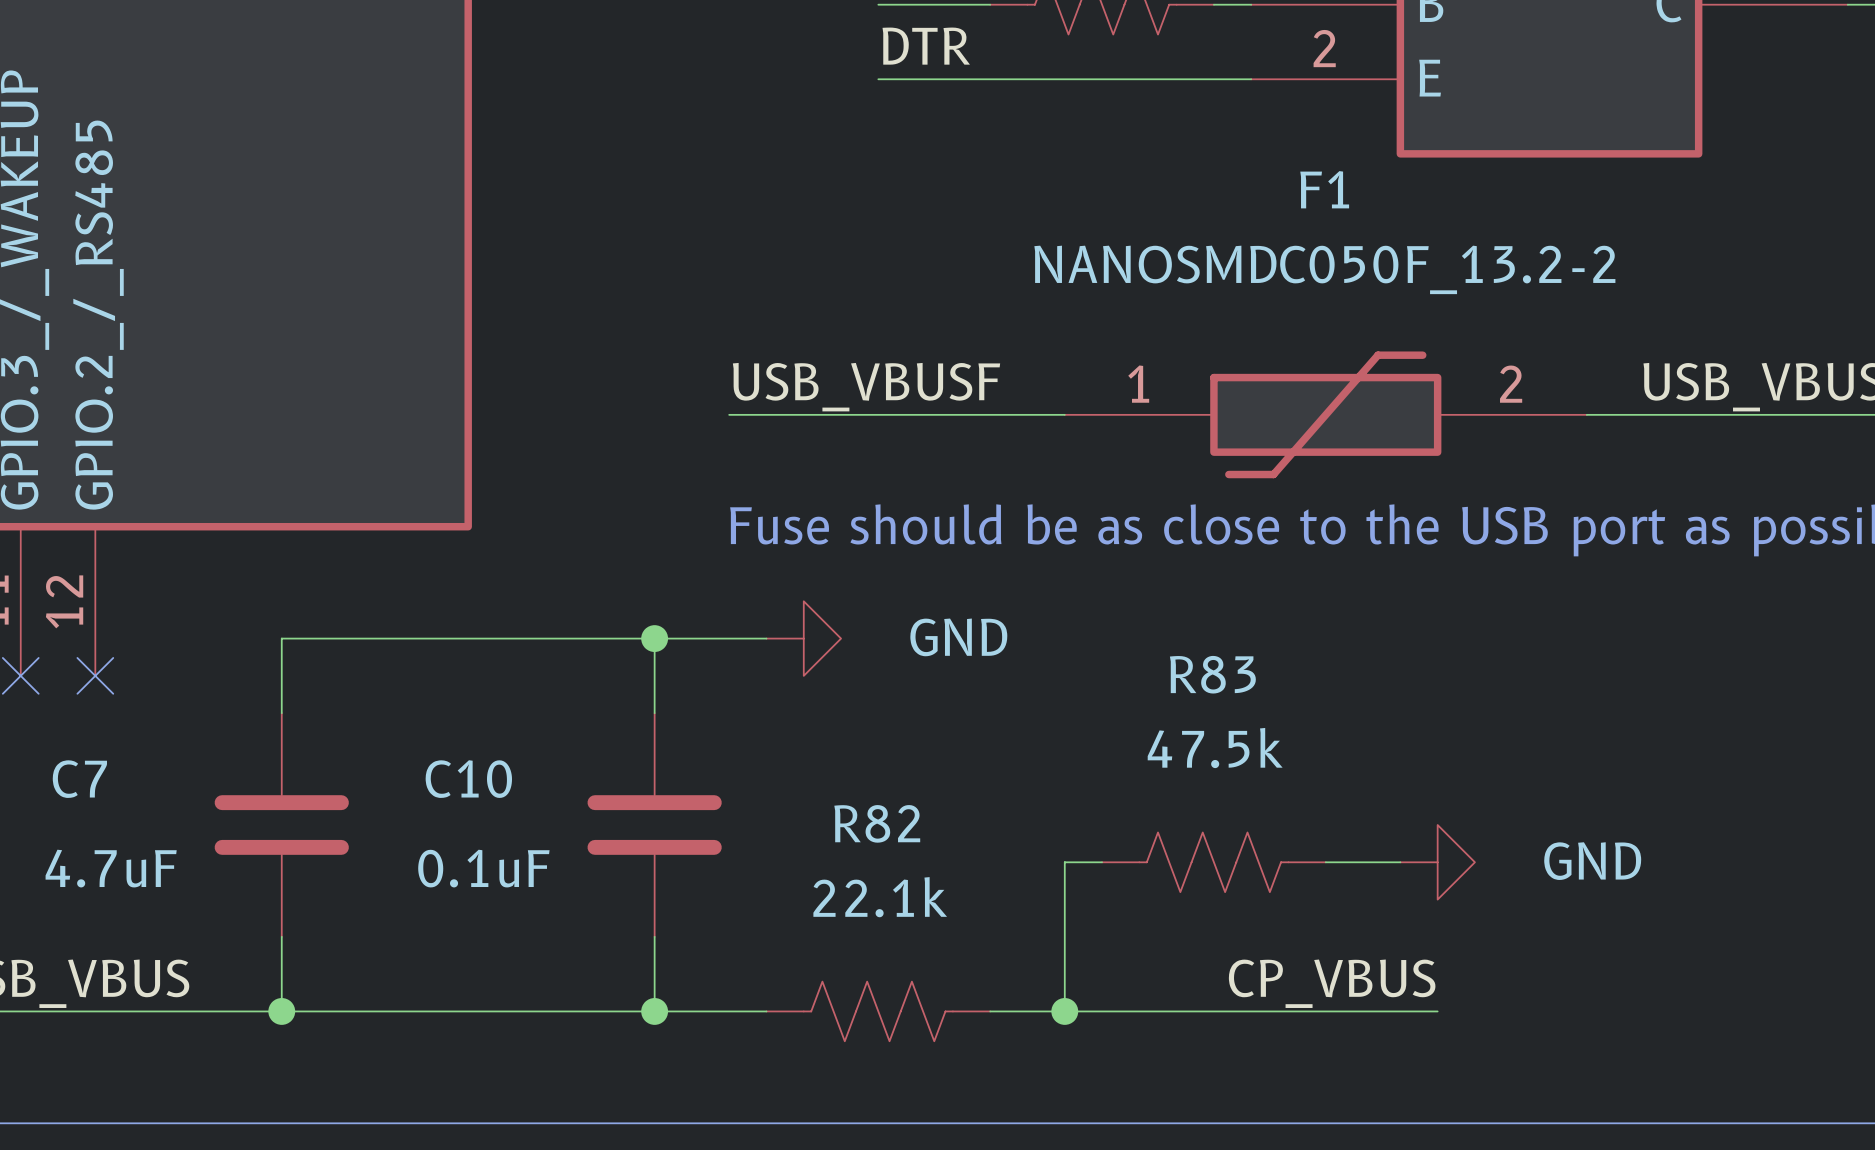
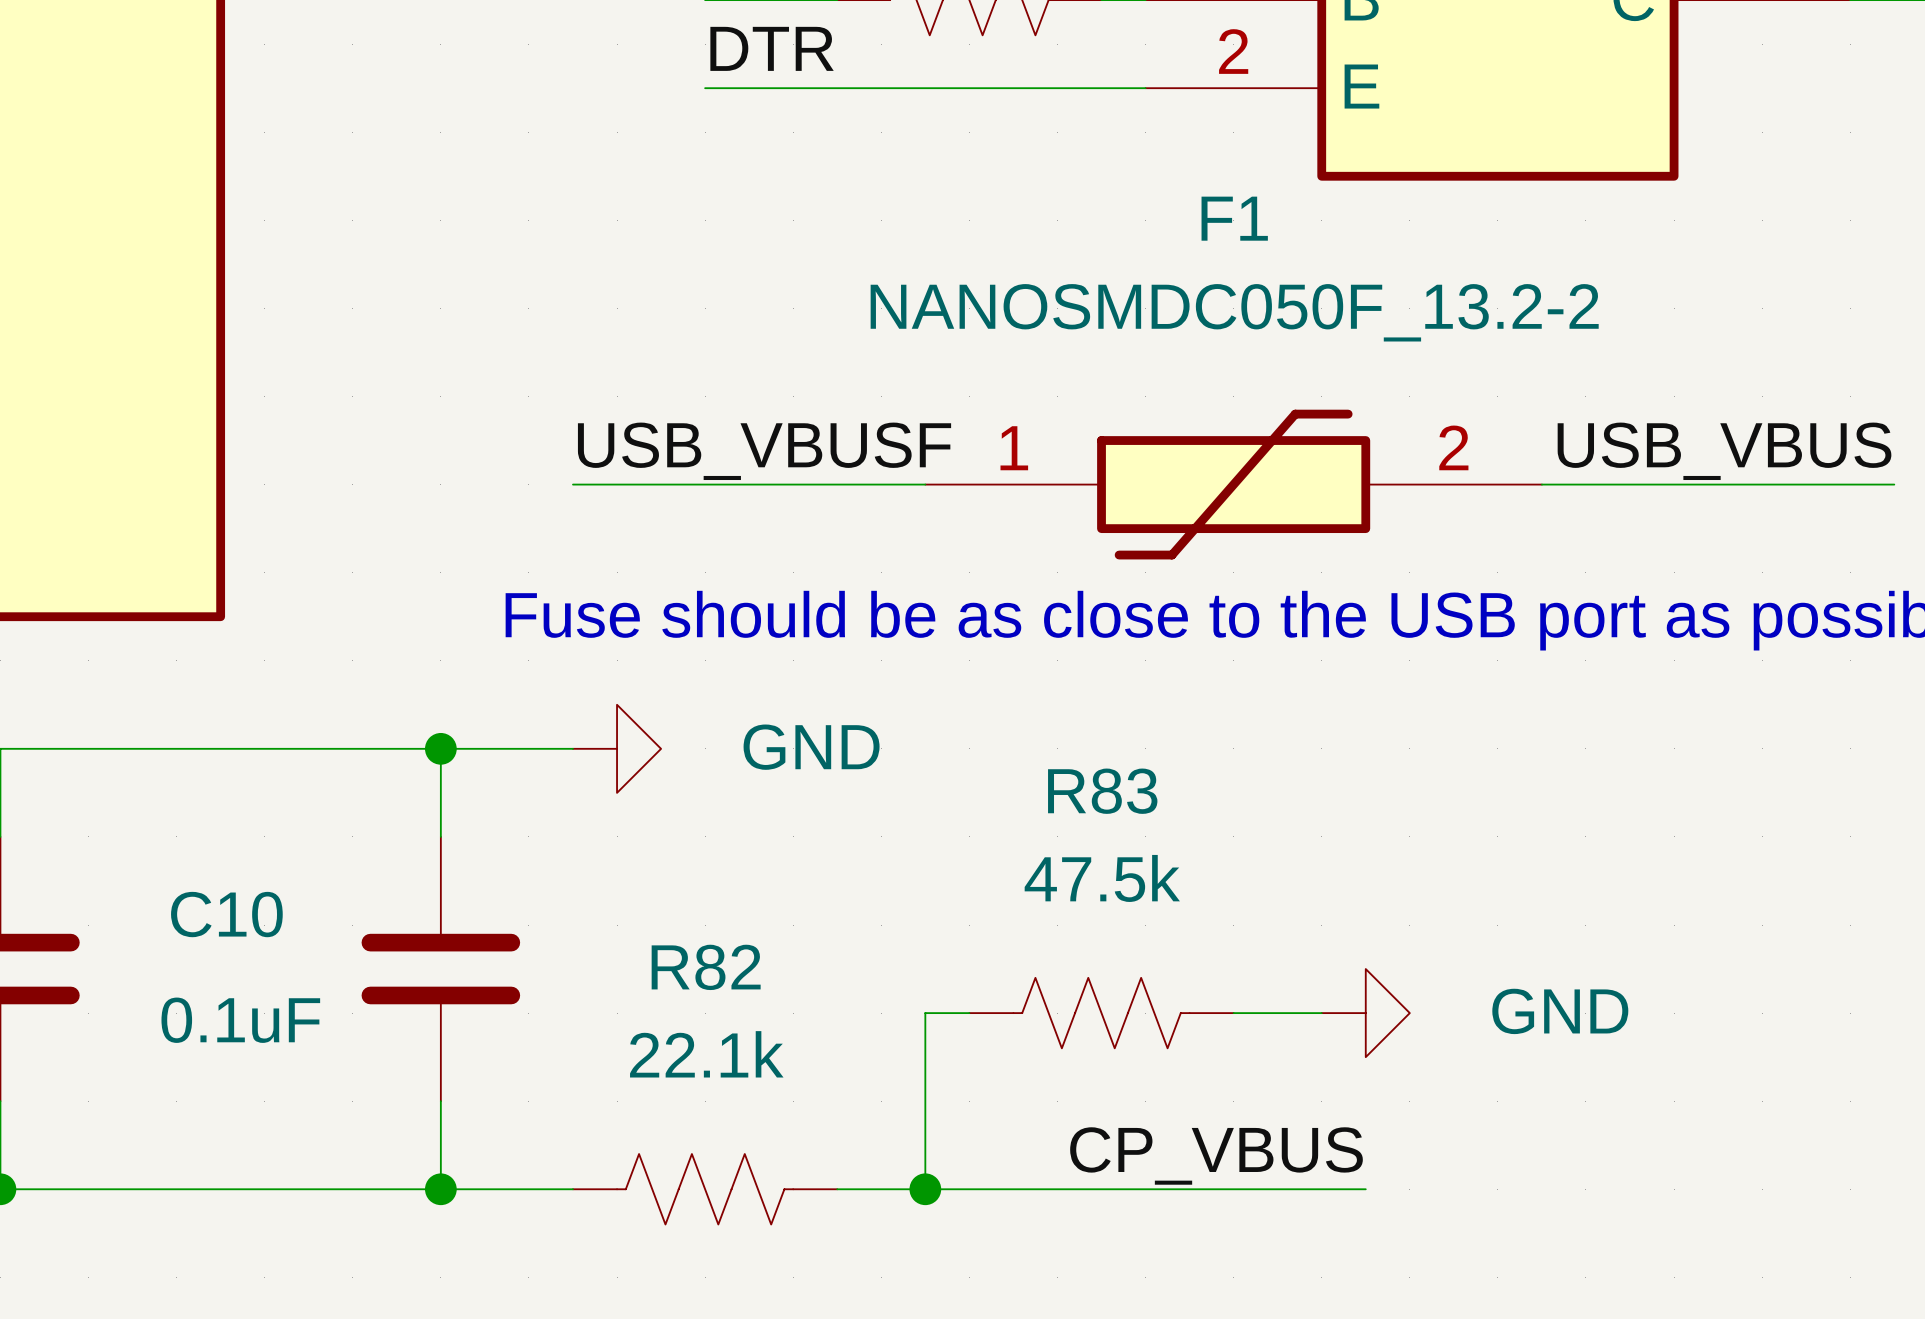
label position: USB_VBUSF (866, 387) -> USB_VBUSF (764, 451)
wire: (729, 414) (766, 414) -> none

